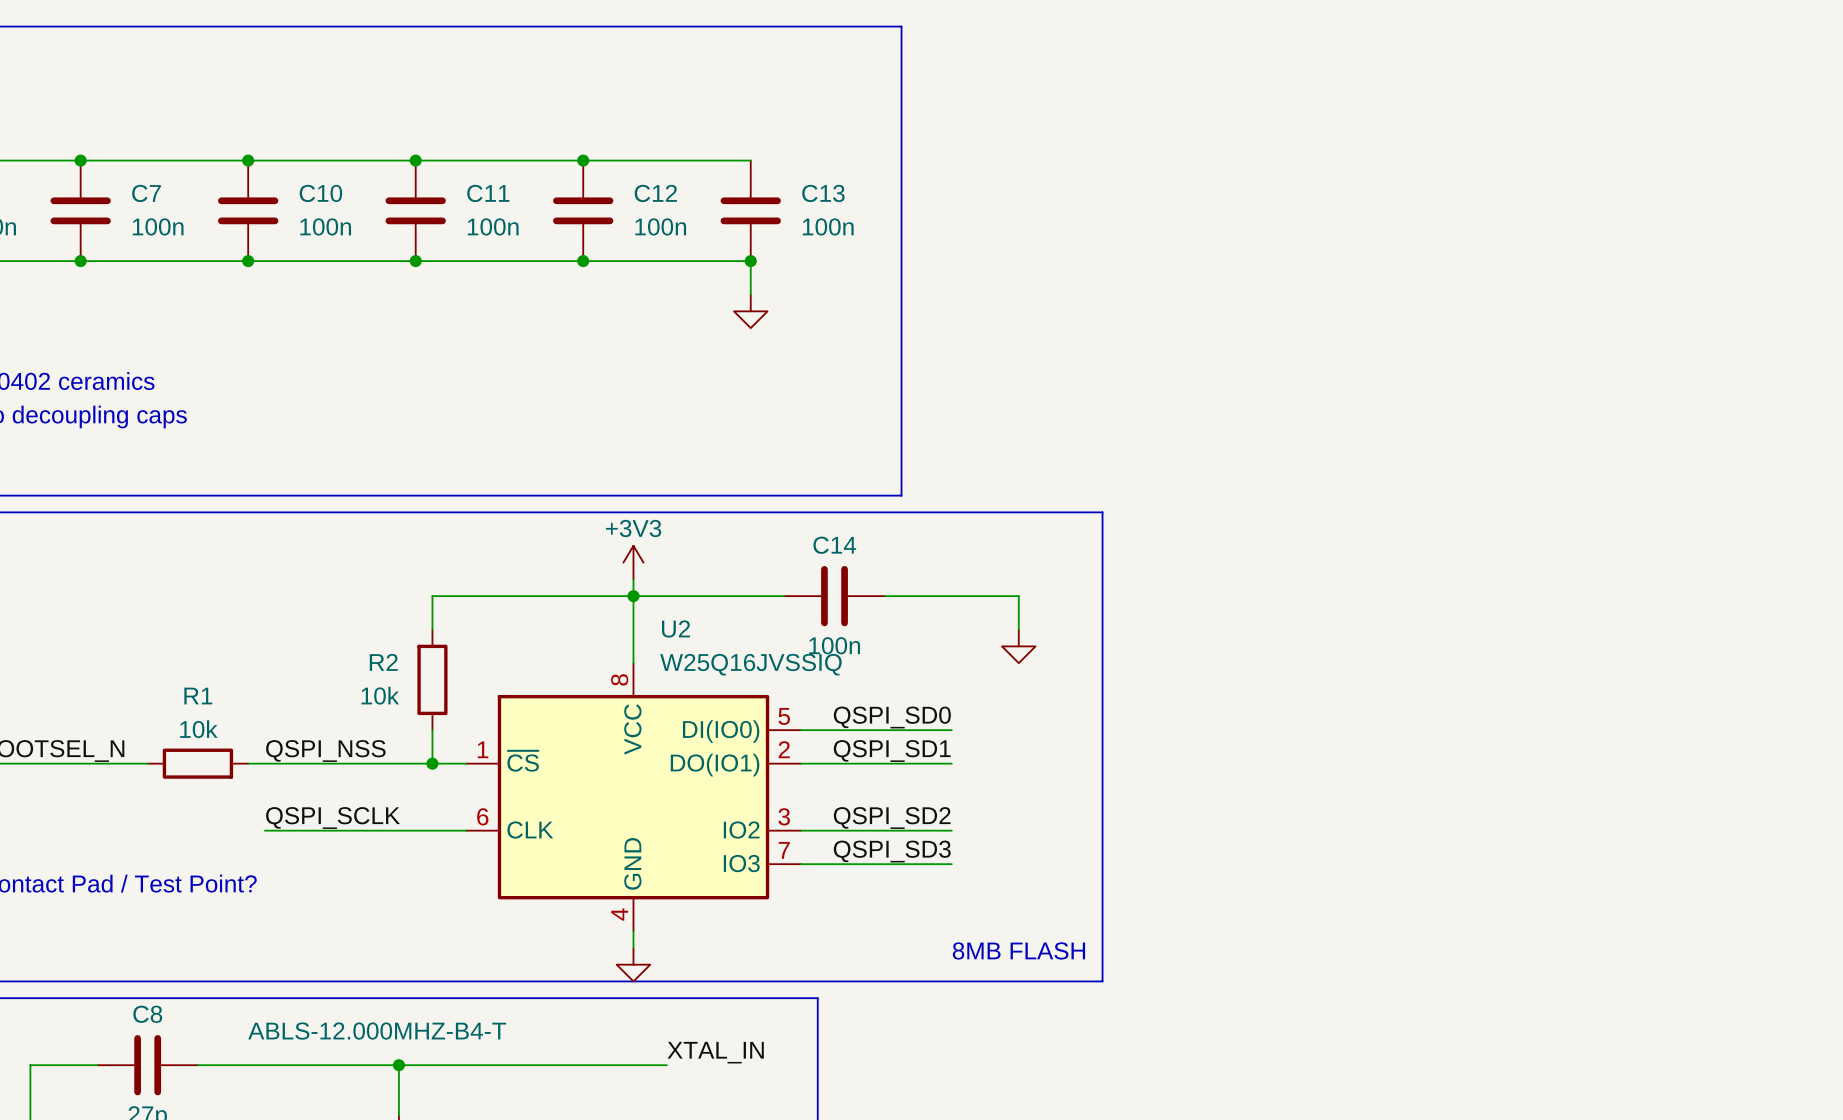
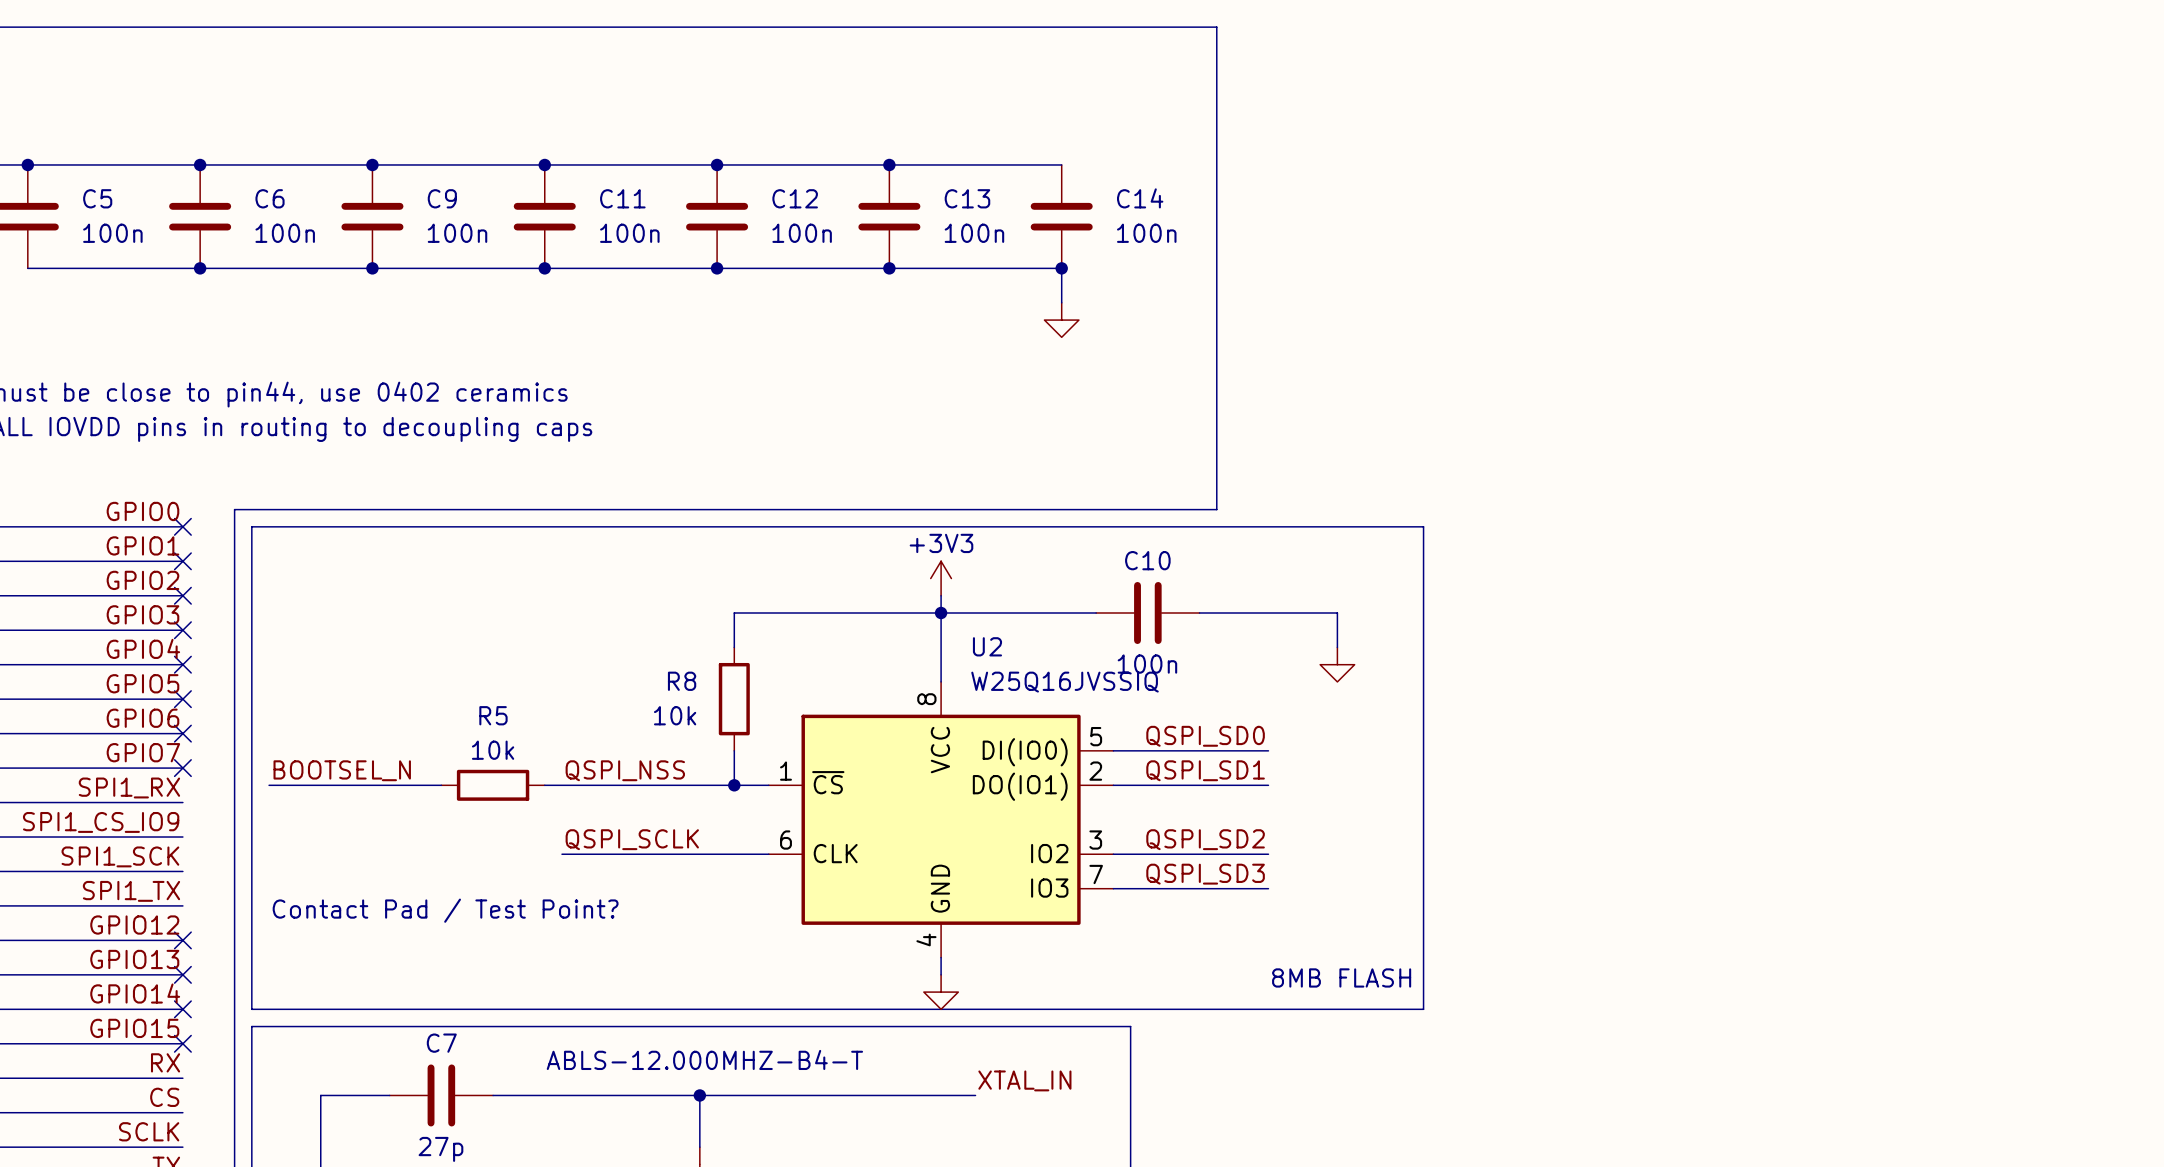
C7 name: C7 (146, 193) -> C9 (442, 198)
C10 name: C10 (320, 193) -> C11 (622, 198)
C11 name: C11 (488, 193) -> C12 (795, 198)
C12 name: C12 (655, 193) -> C13 (967, 198)
C13 name: C13 (823, 193) -> C14 (1140, 198)
C14 name: C14 (834, 545) -> C10 (1147, 560)
R2 name: R2 (383, 662) -> R8 (682, 681)
R1 name: R1 (198, 696) -> R5 (493, 715)
C8 name: C8 (147, 1014) -> C7 (441, 1043)

